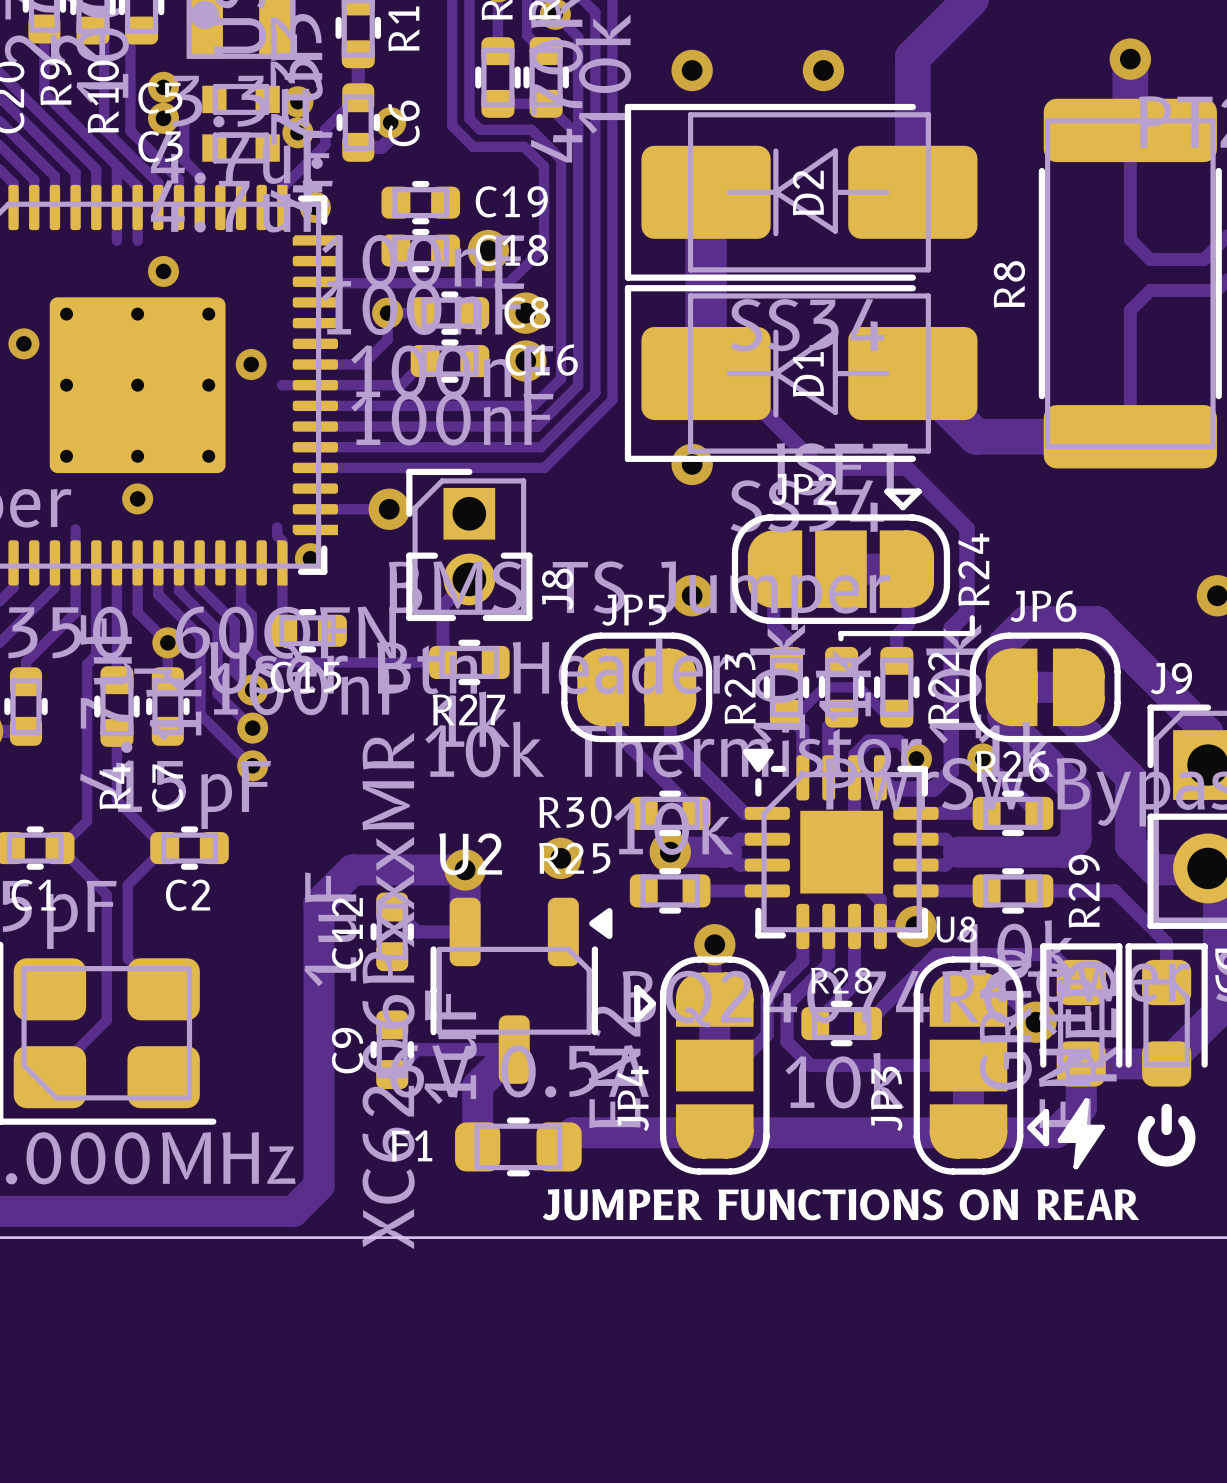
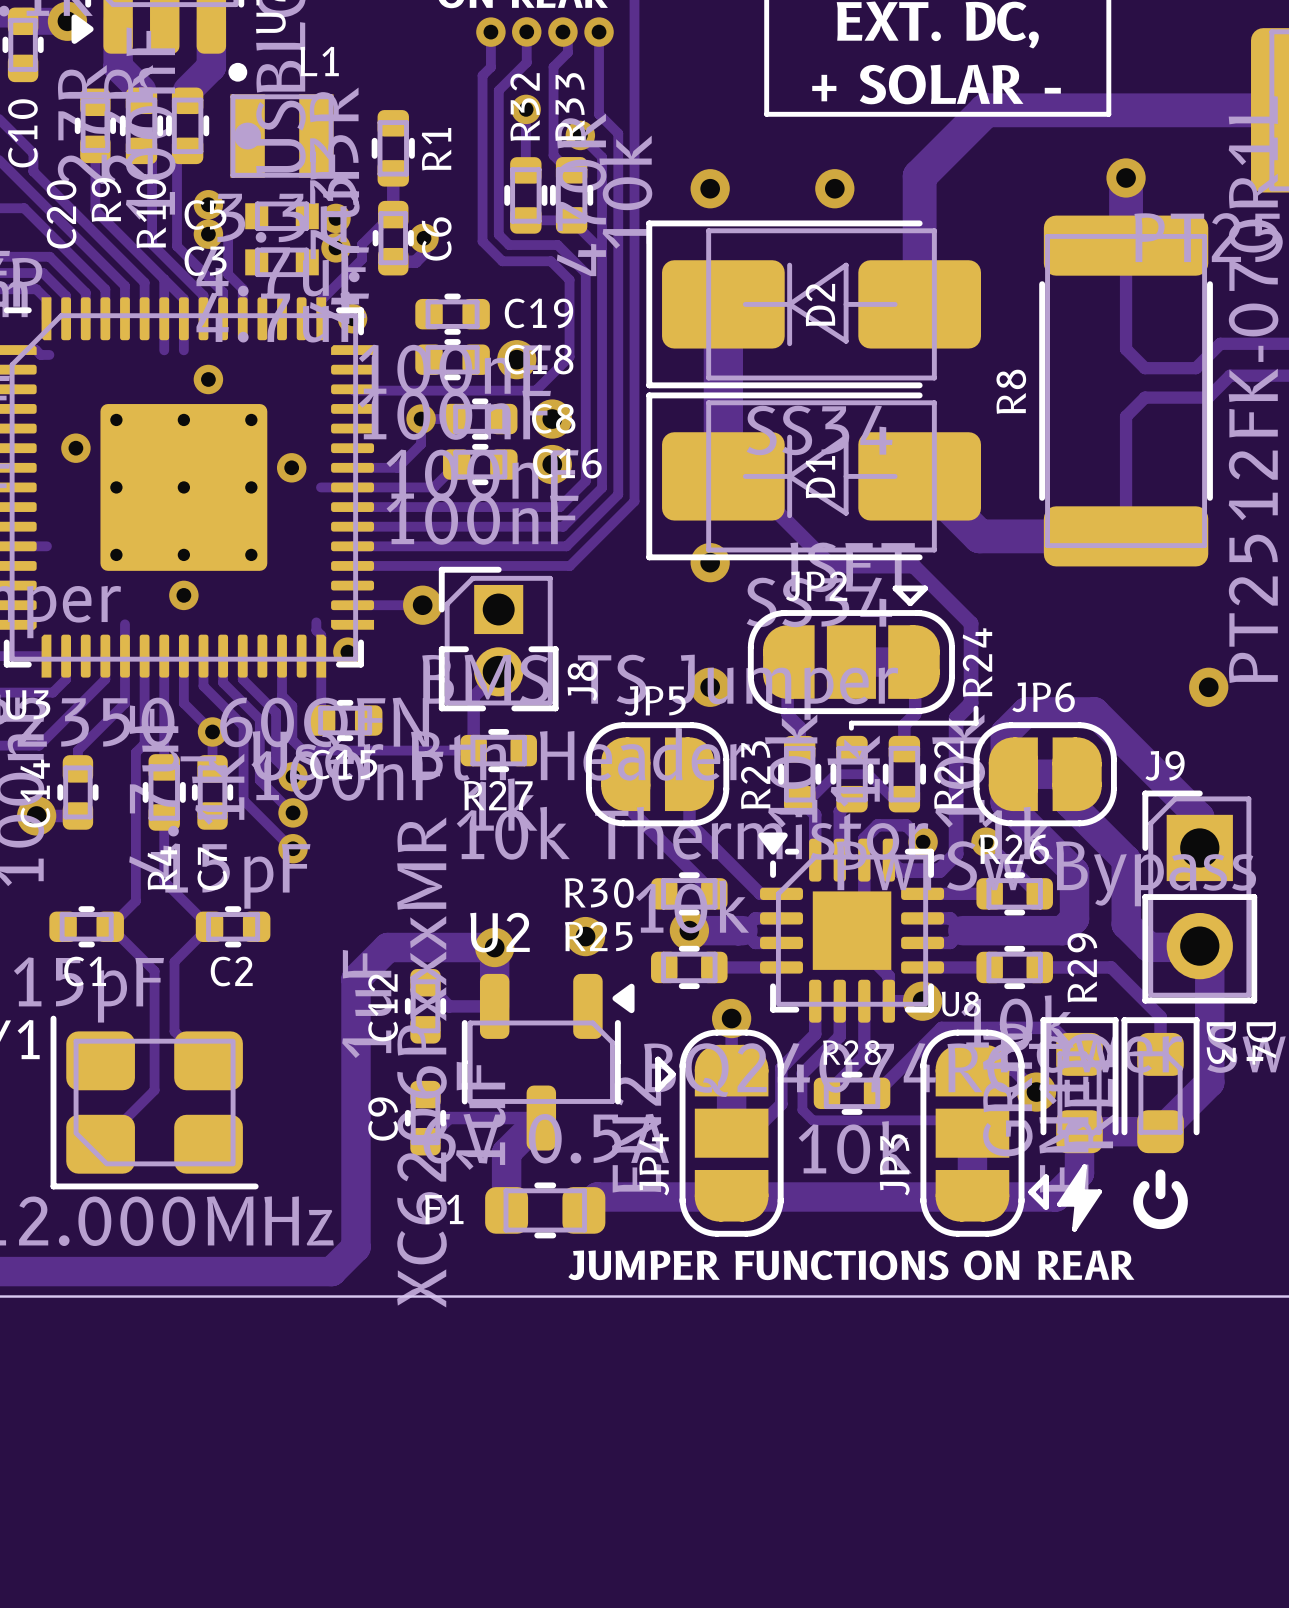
track: (789, 1002) (787, 1005) (787, 1041) (810, 1065) (968, 1065) -> (802, 1073) (802, 1110) (812, 1120) (959, 1120) (972, 1133)

